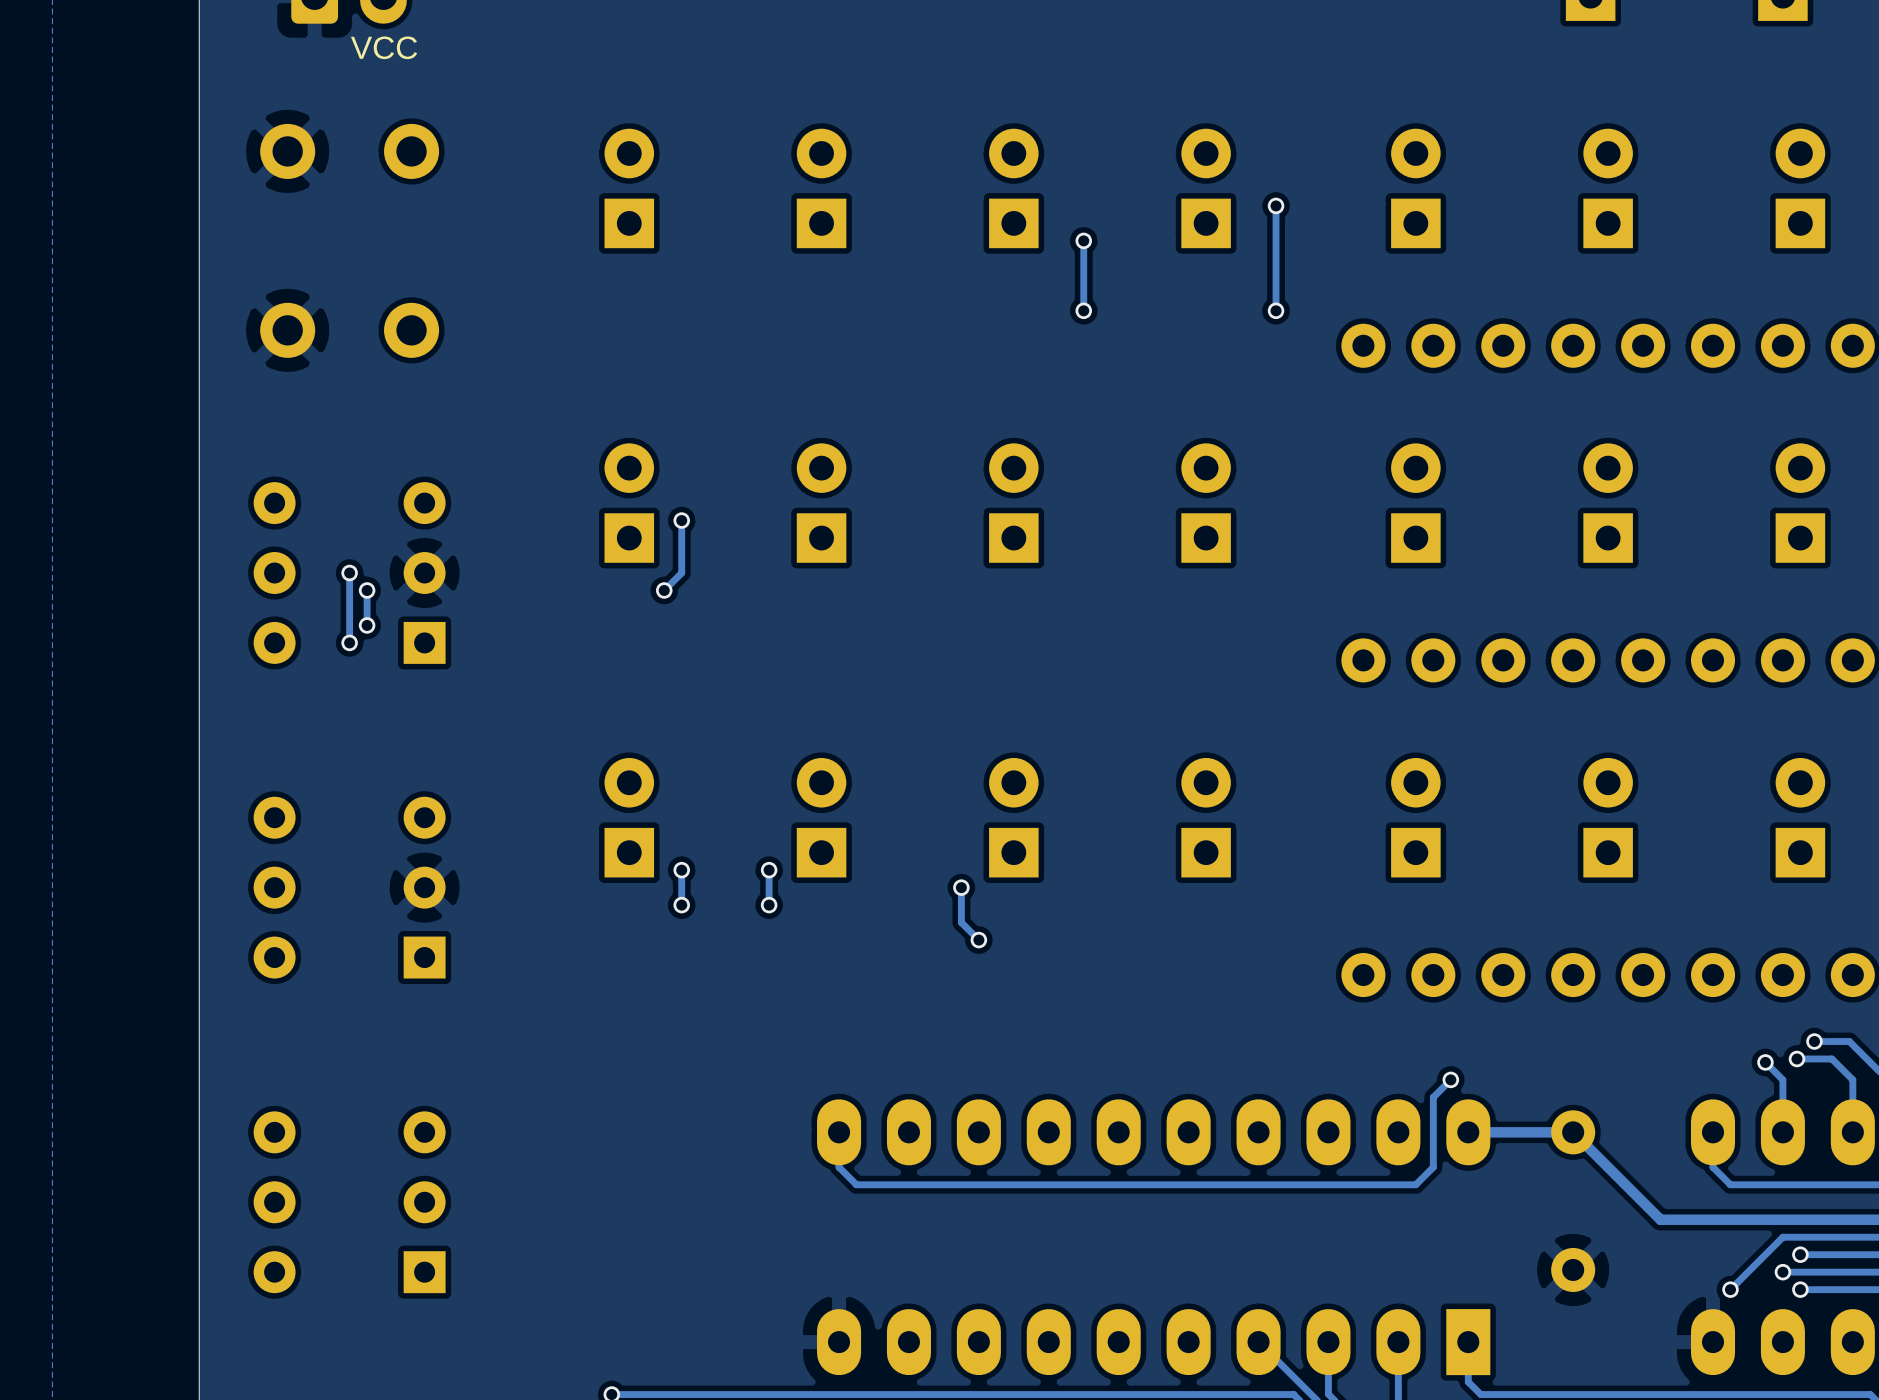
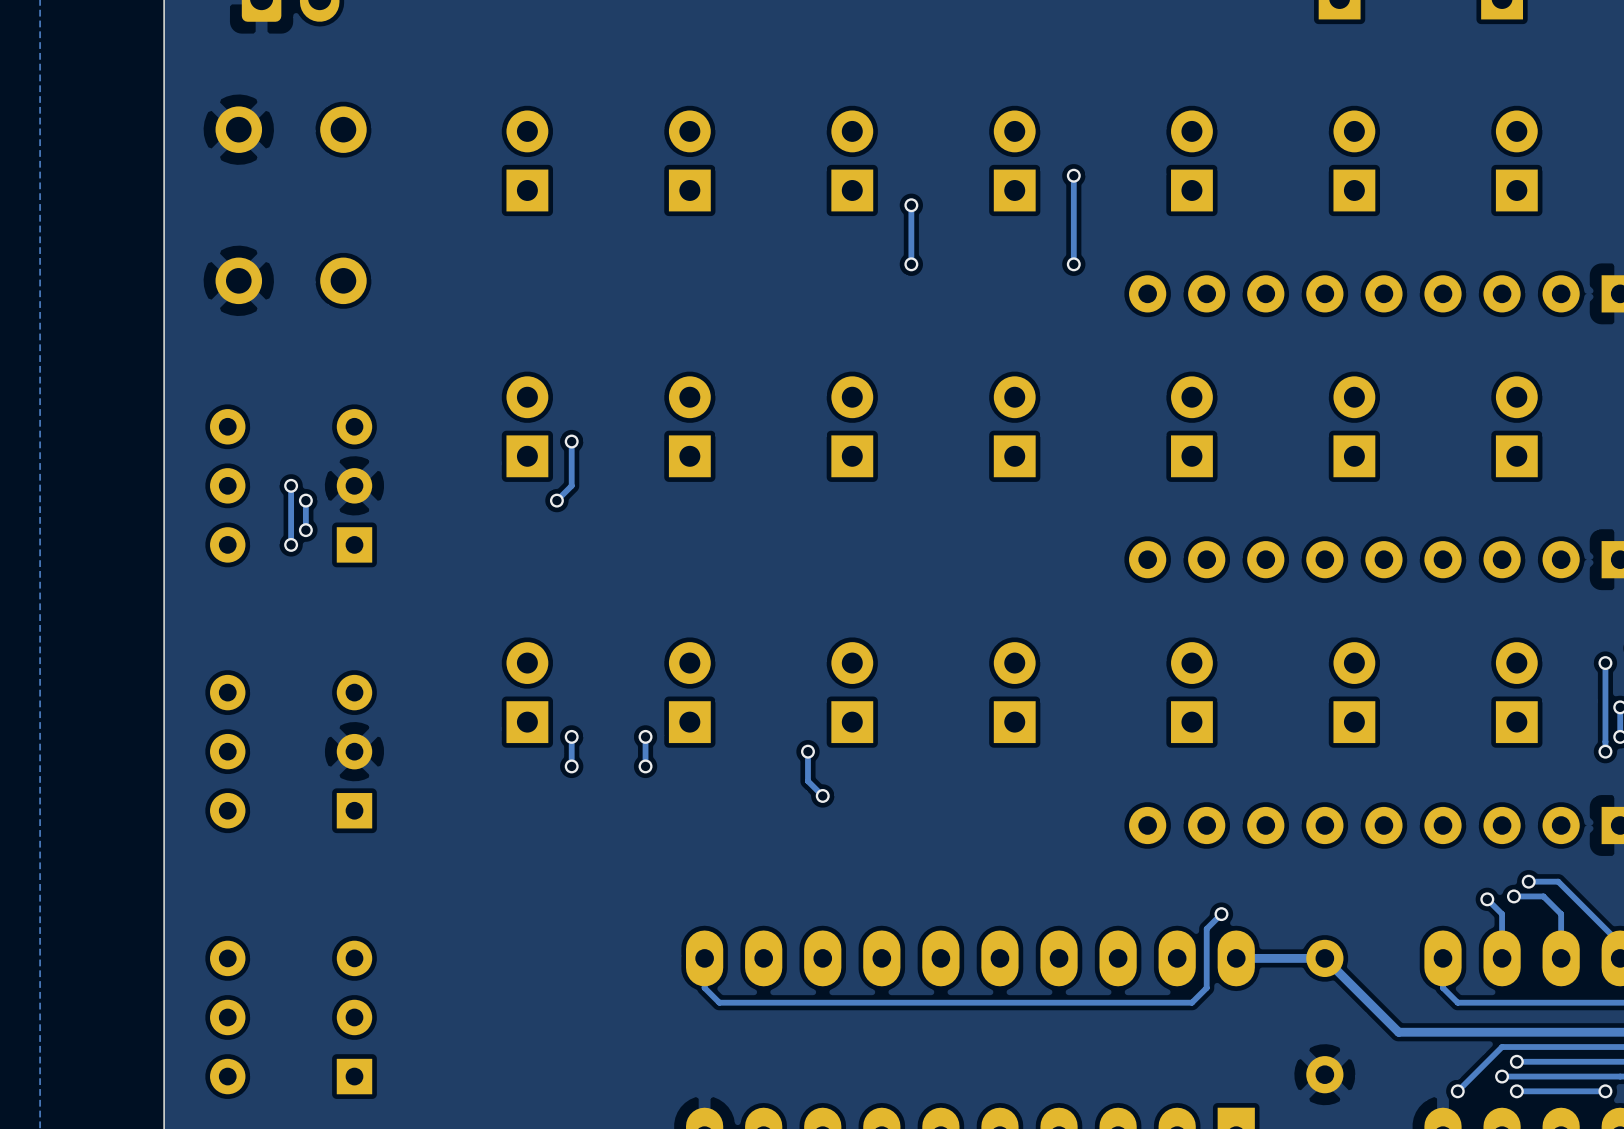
text: VCC (384, 47) -> none

